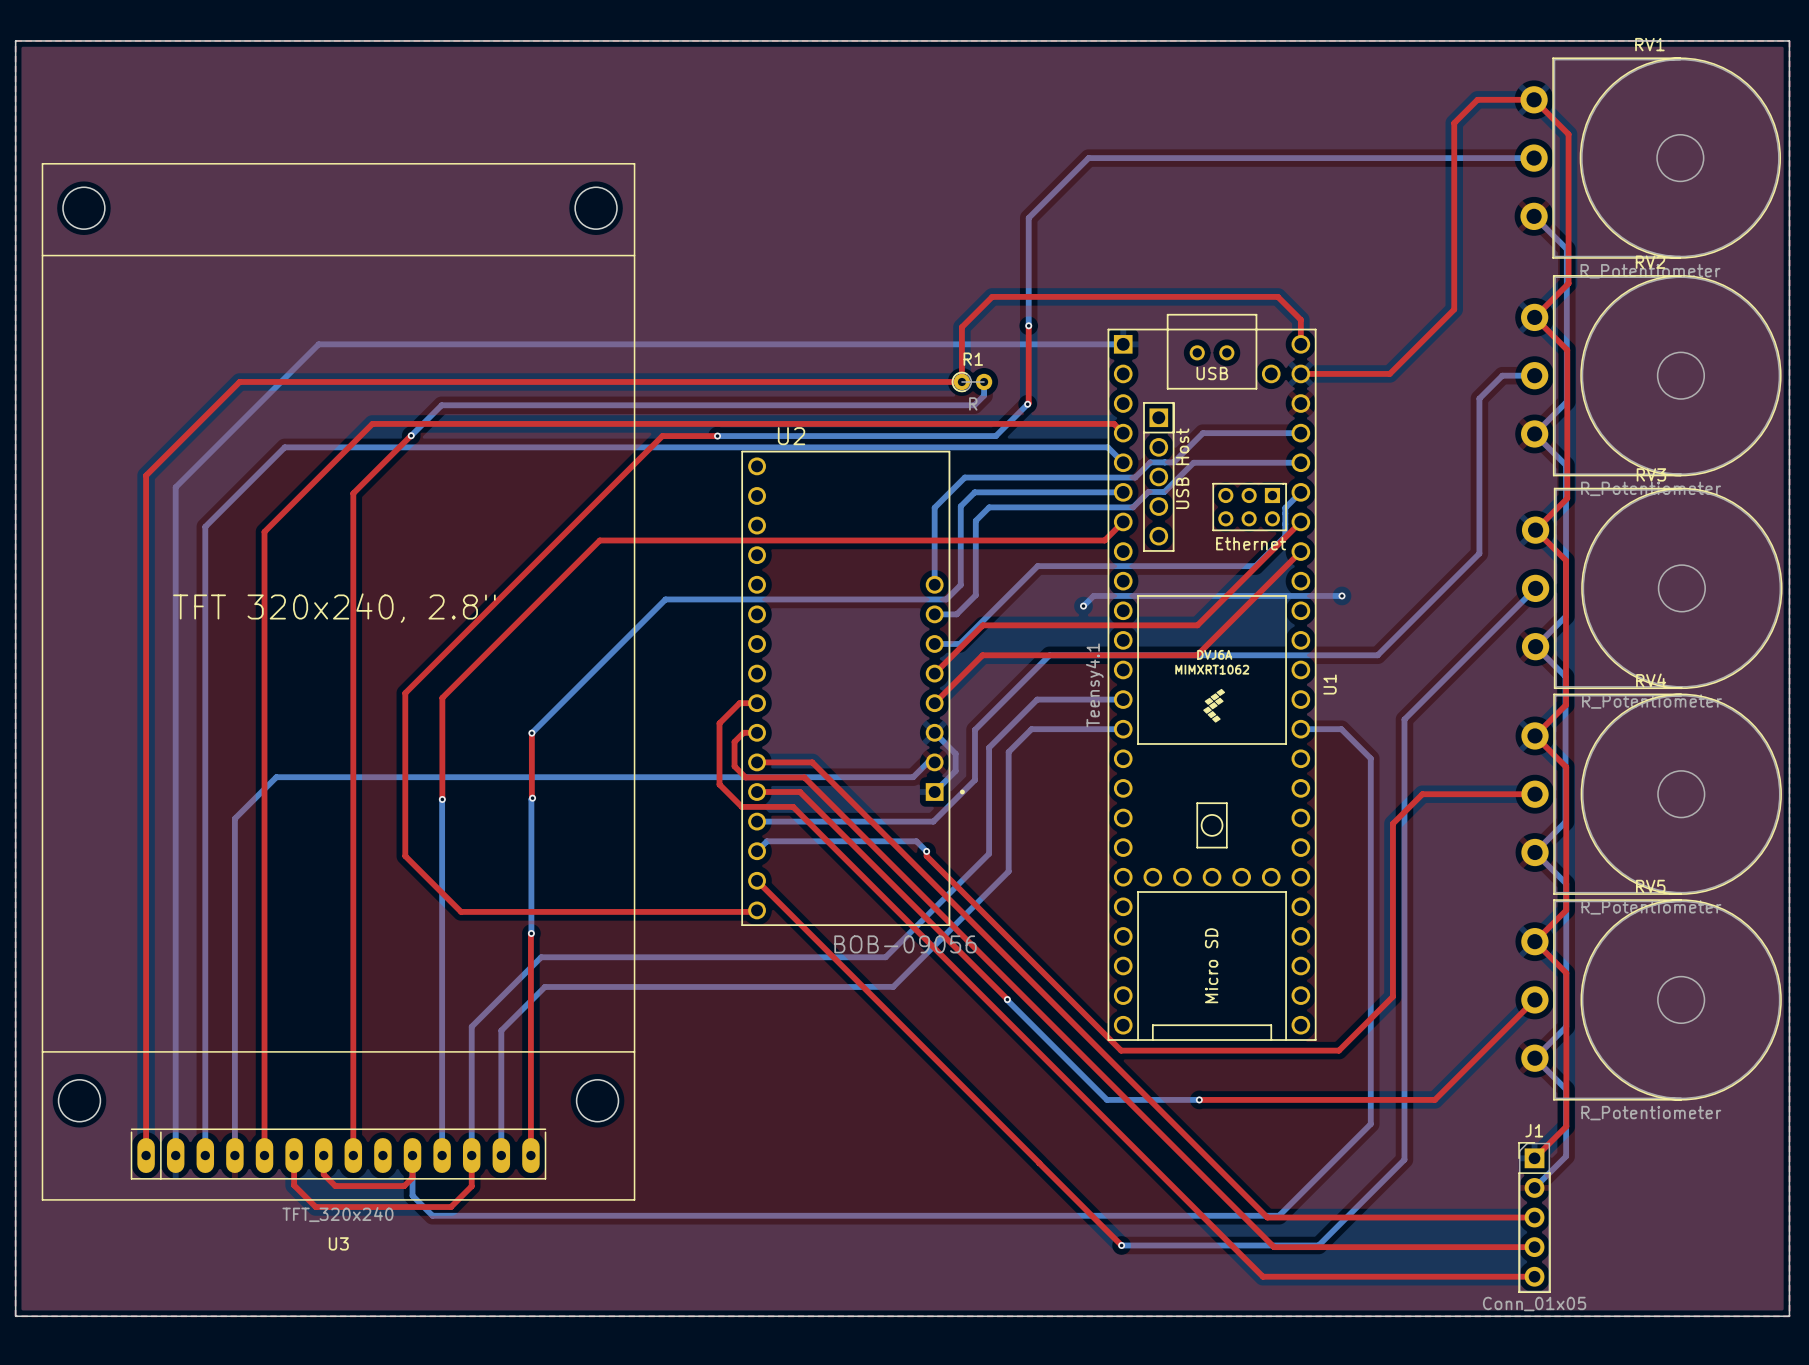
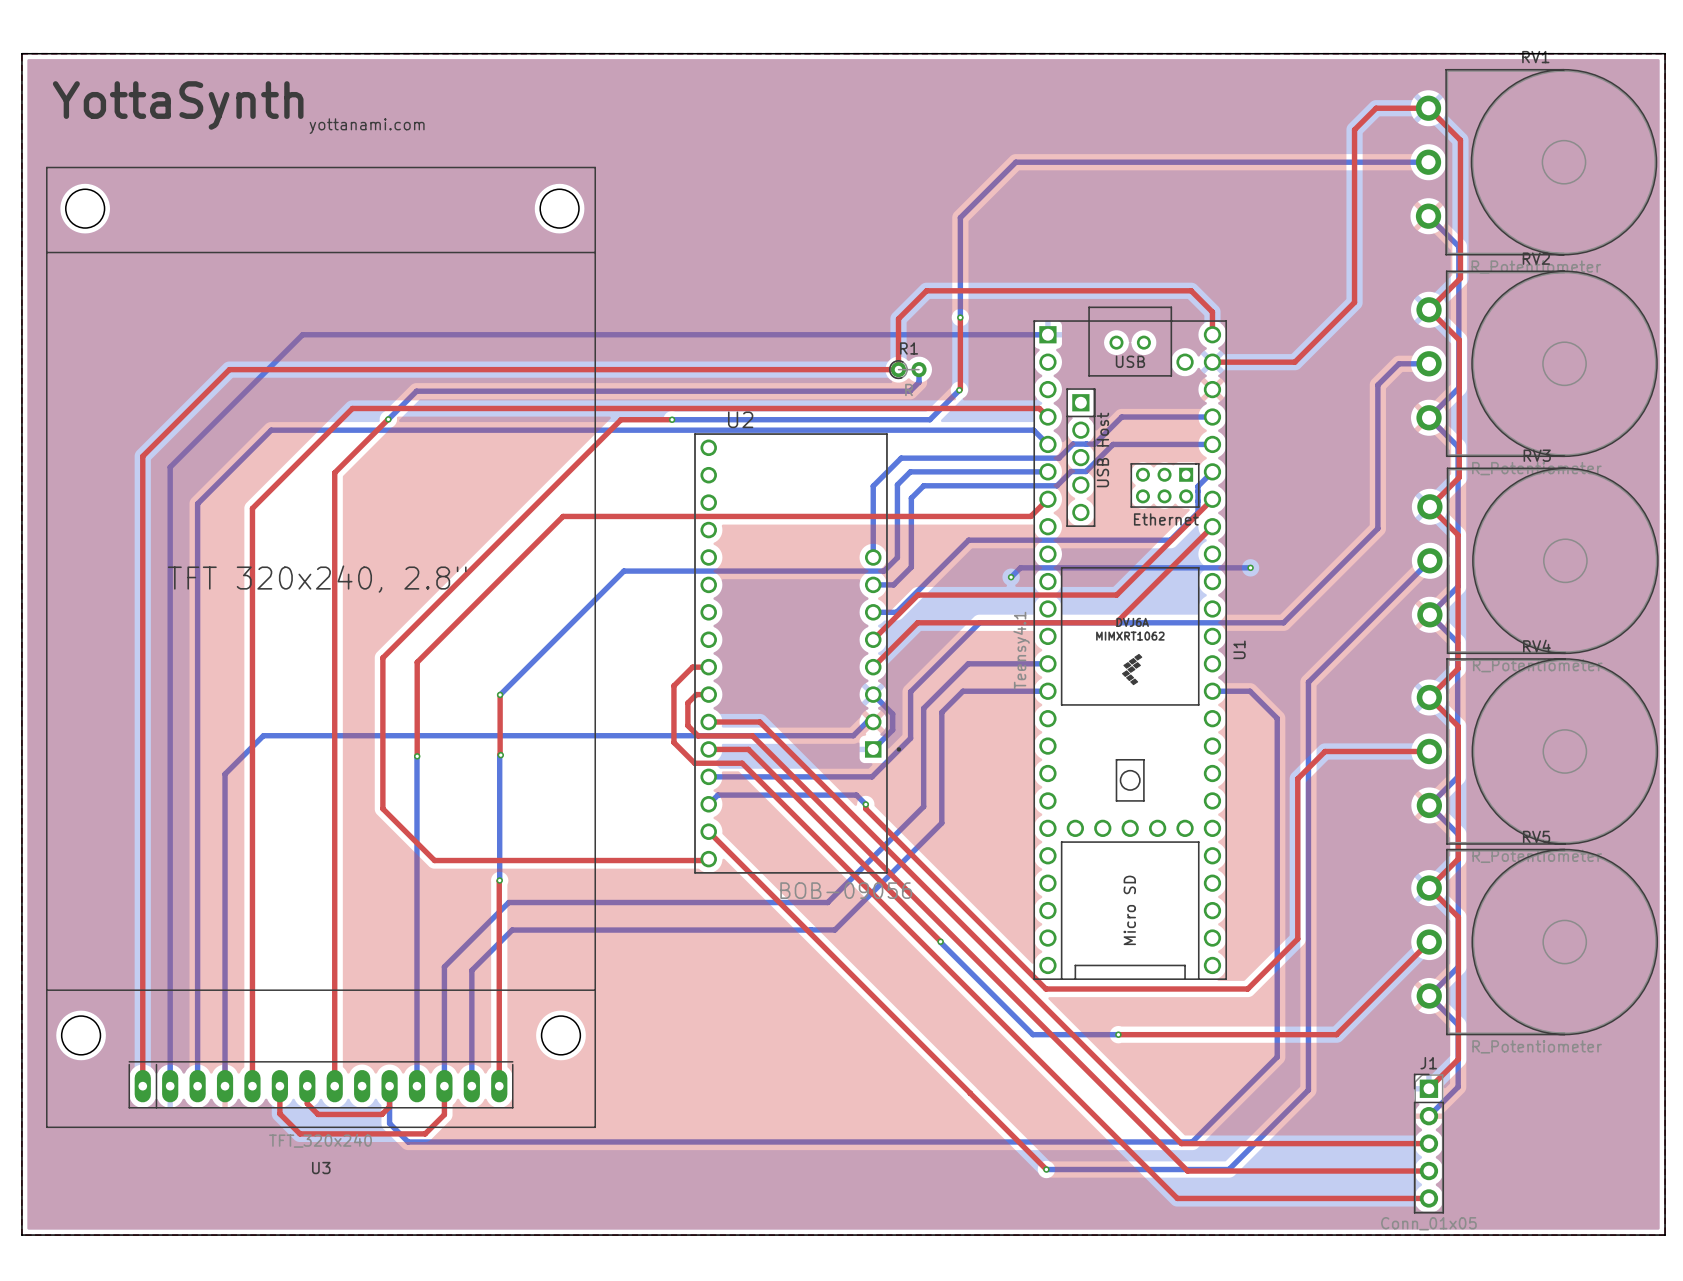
text: none -> YottaSynth (178, 105)
text: none -> yottanami.com (367, 126)

